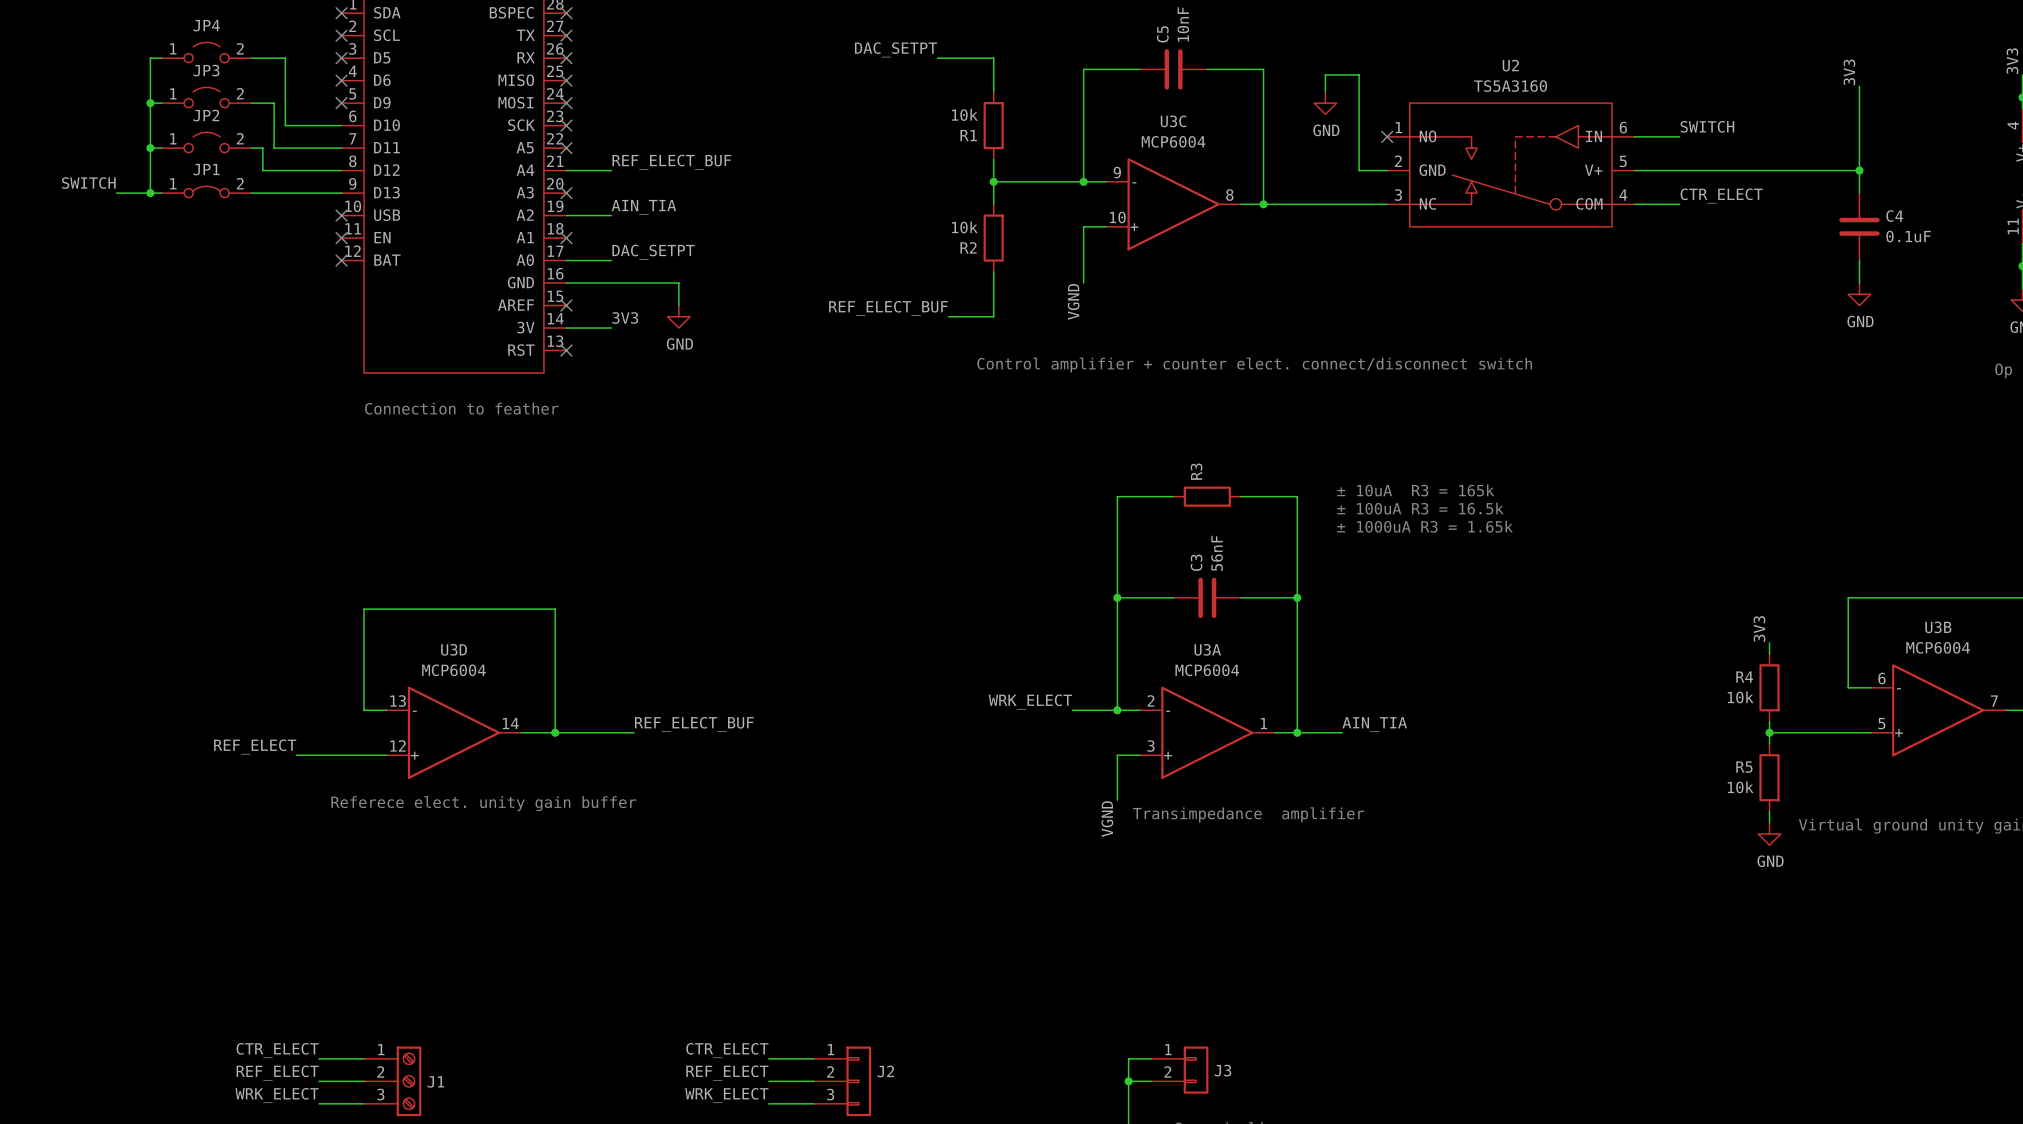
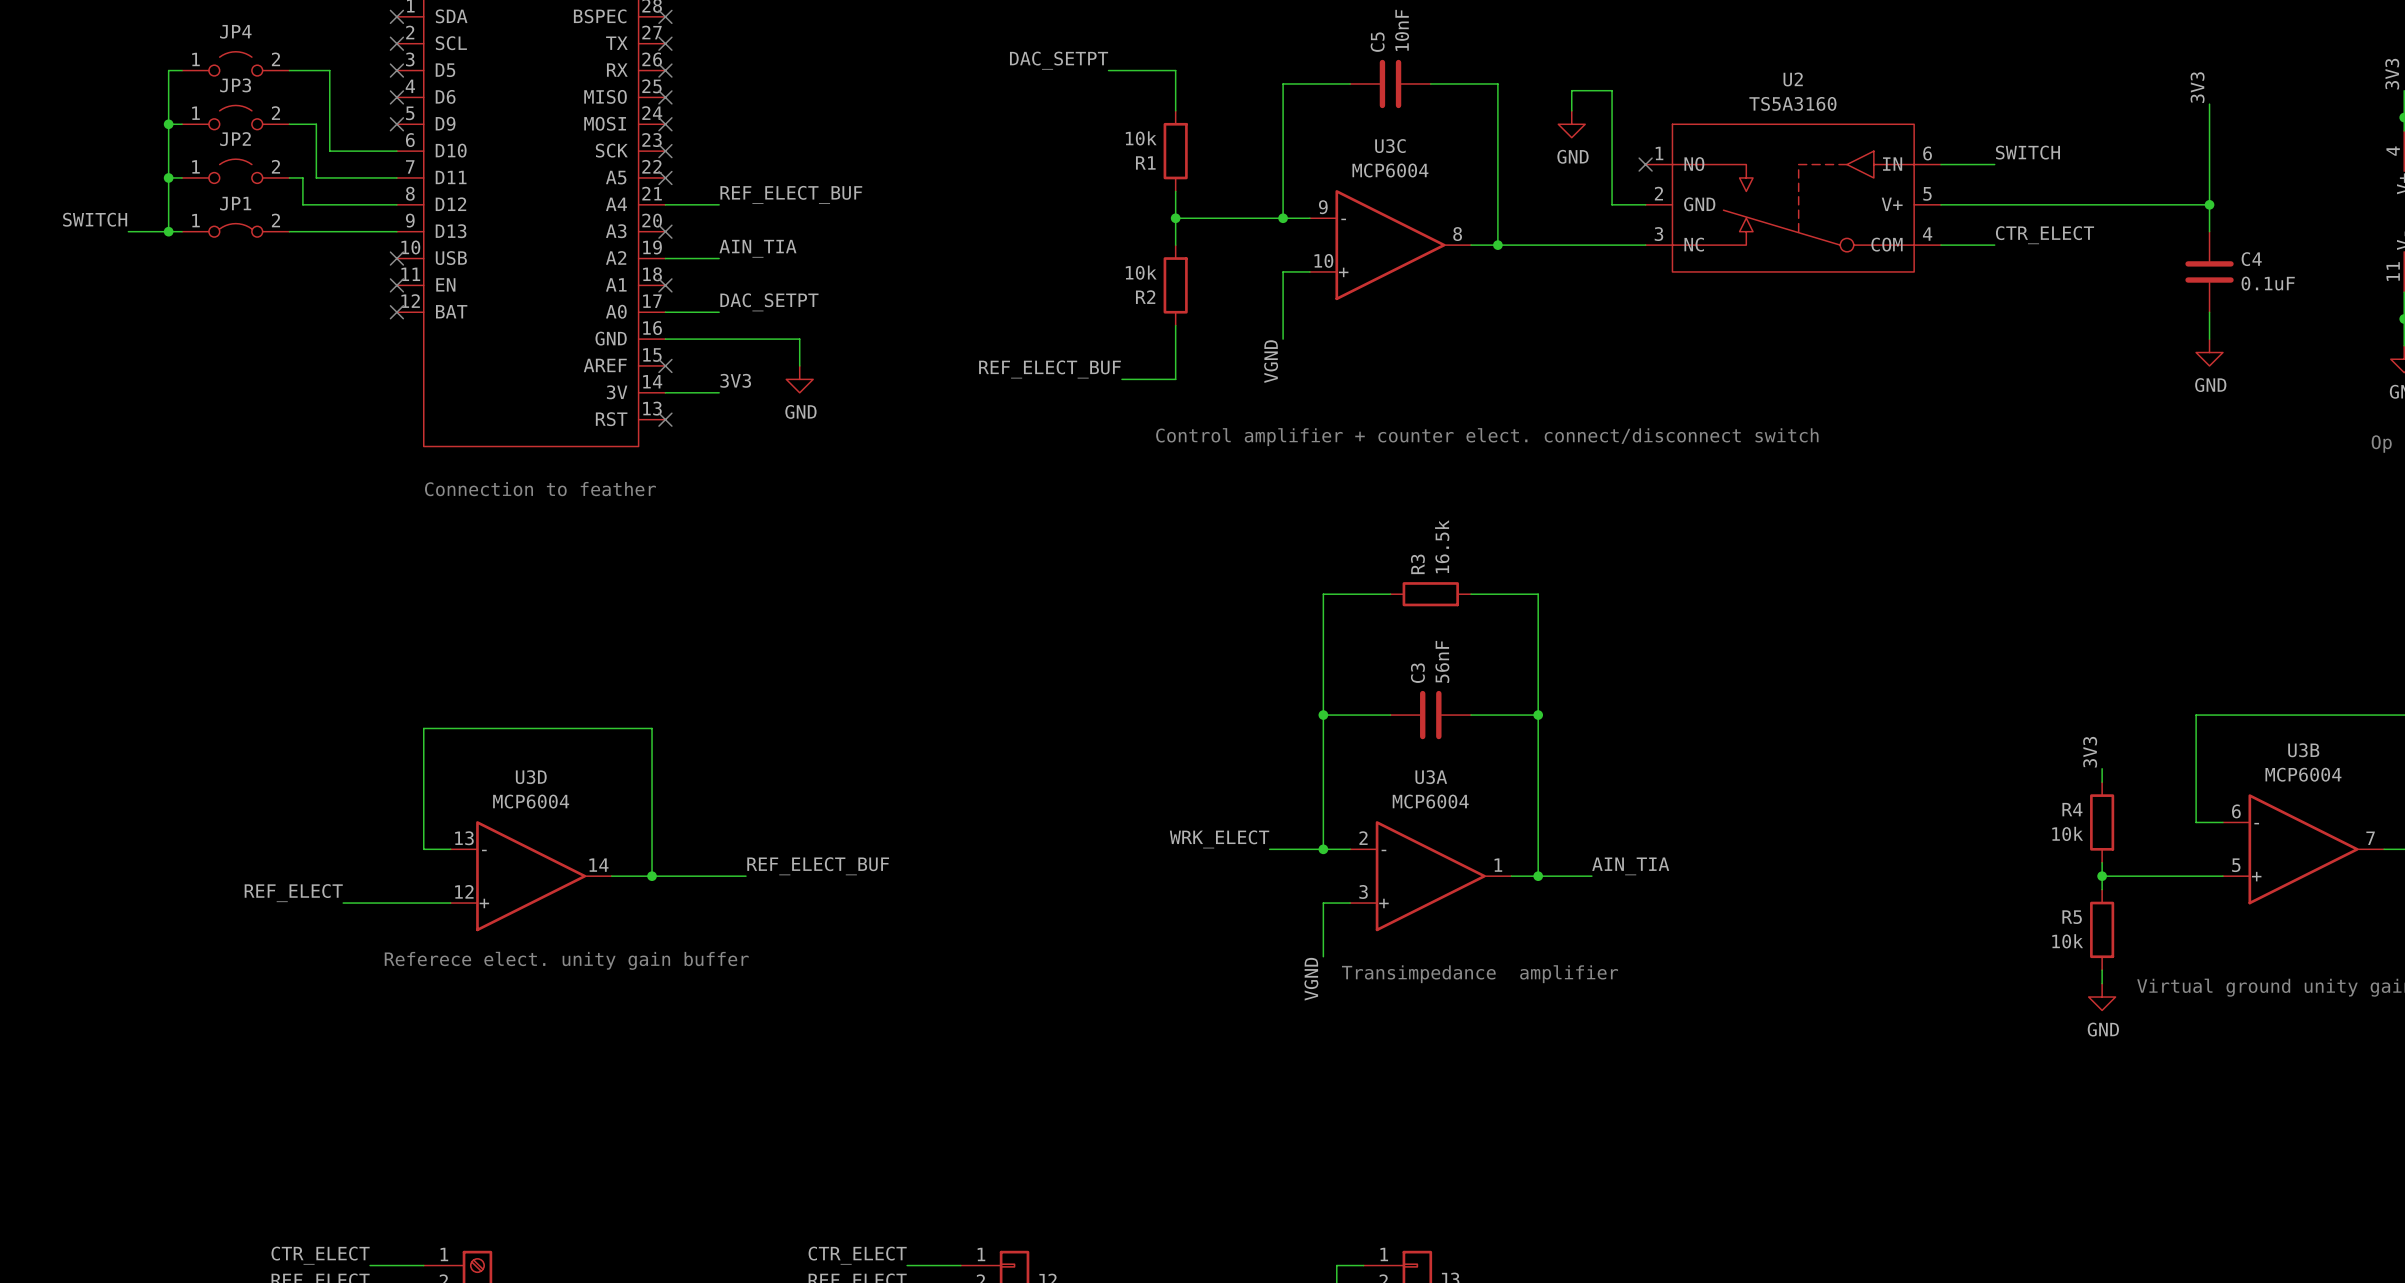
R3 value: none -> 16.5k (1442, 546)
text: ± 10uA R3 = 165k (1415, 490) -> none
text: ± 100uA R3 = 16.5k (1420, 508) -> none
text: ± 1000uA R3 = 1.65k (1425, 526) -> none

